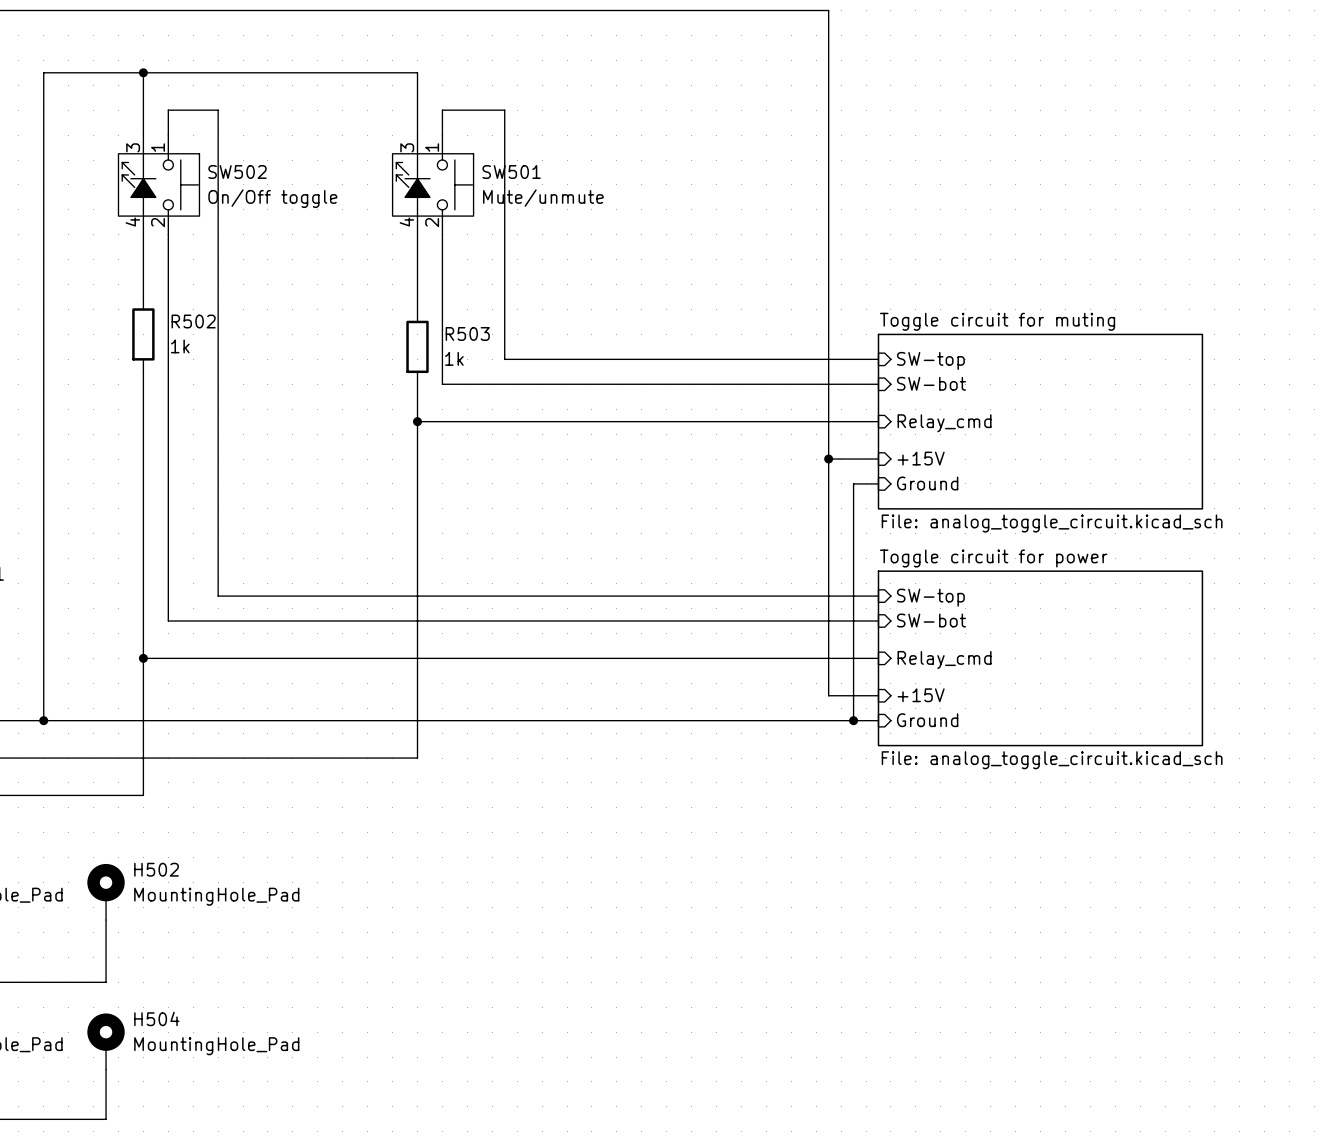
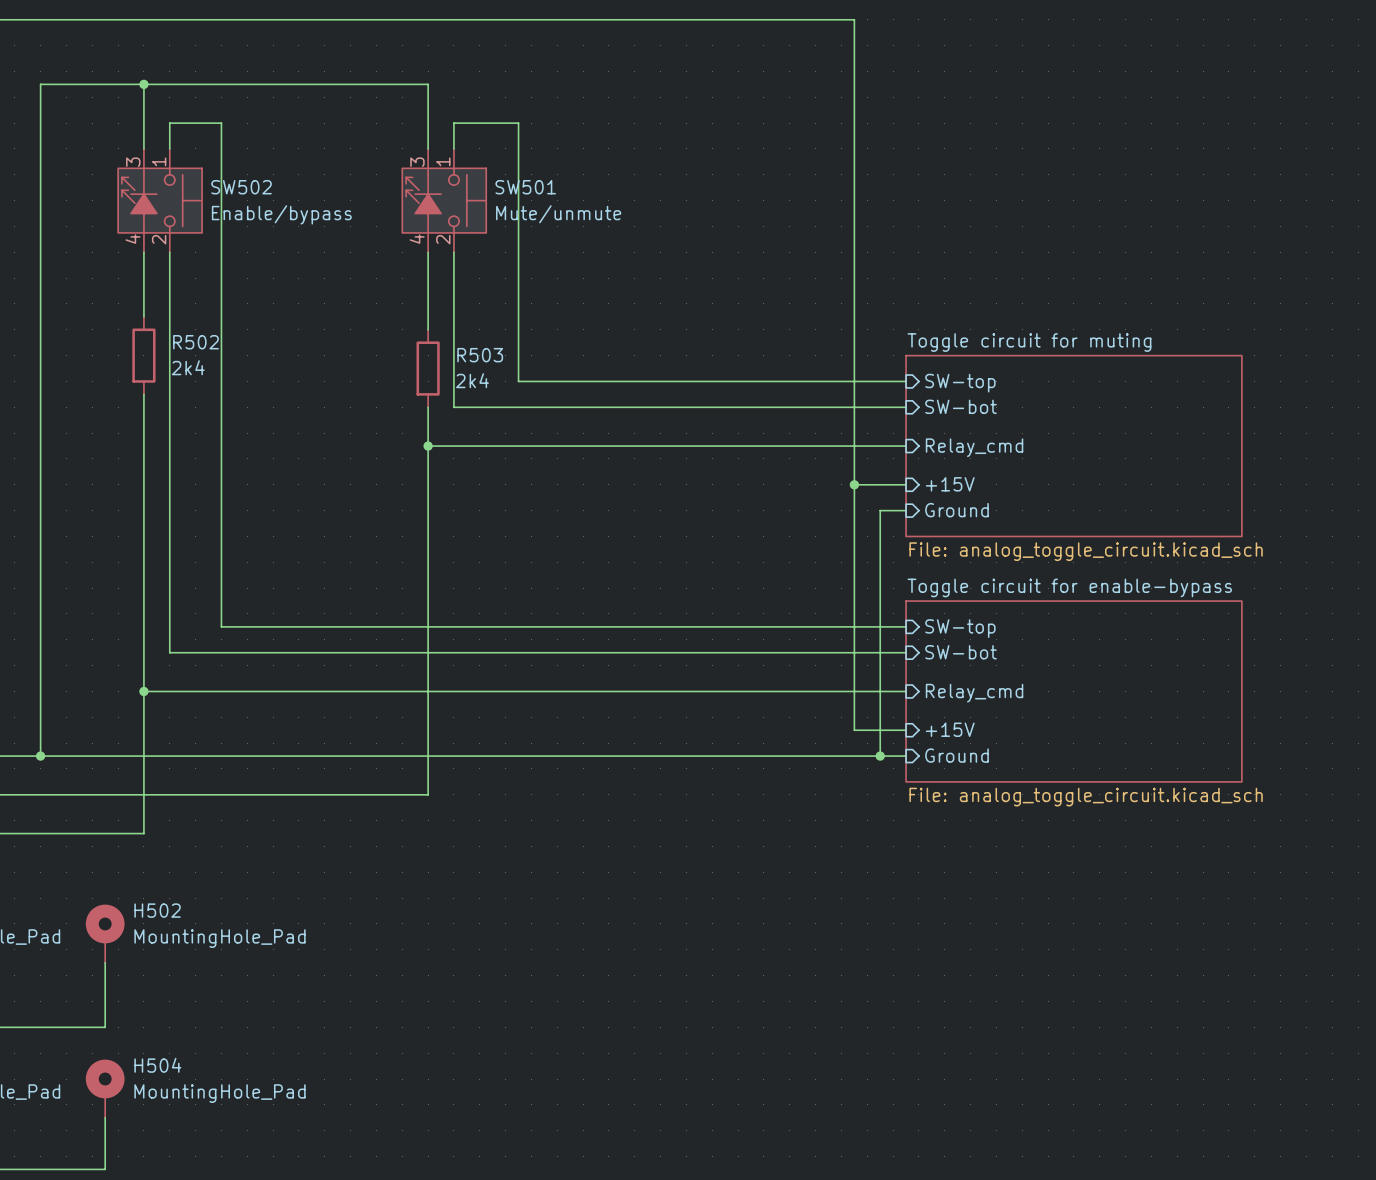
SW502 value: On/Off toggle (272, 198) -> Enable/bypass (281, 214)
R502 value: 1k (180, 346) -> 2k4 (188, 367)
R503 value: 1k (454, 358) -> 2k4 (472, 380)
sheet Toggle circuit for power name: Toggle circuit for power (993, 558) -> Toggle circuit for enable-bypass (1069, 587)

